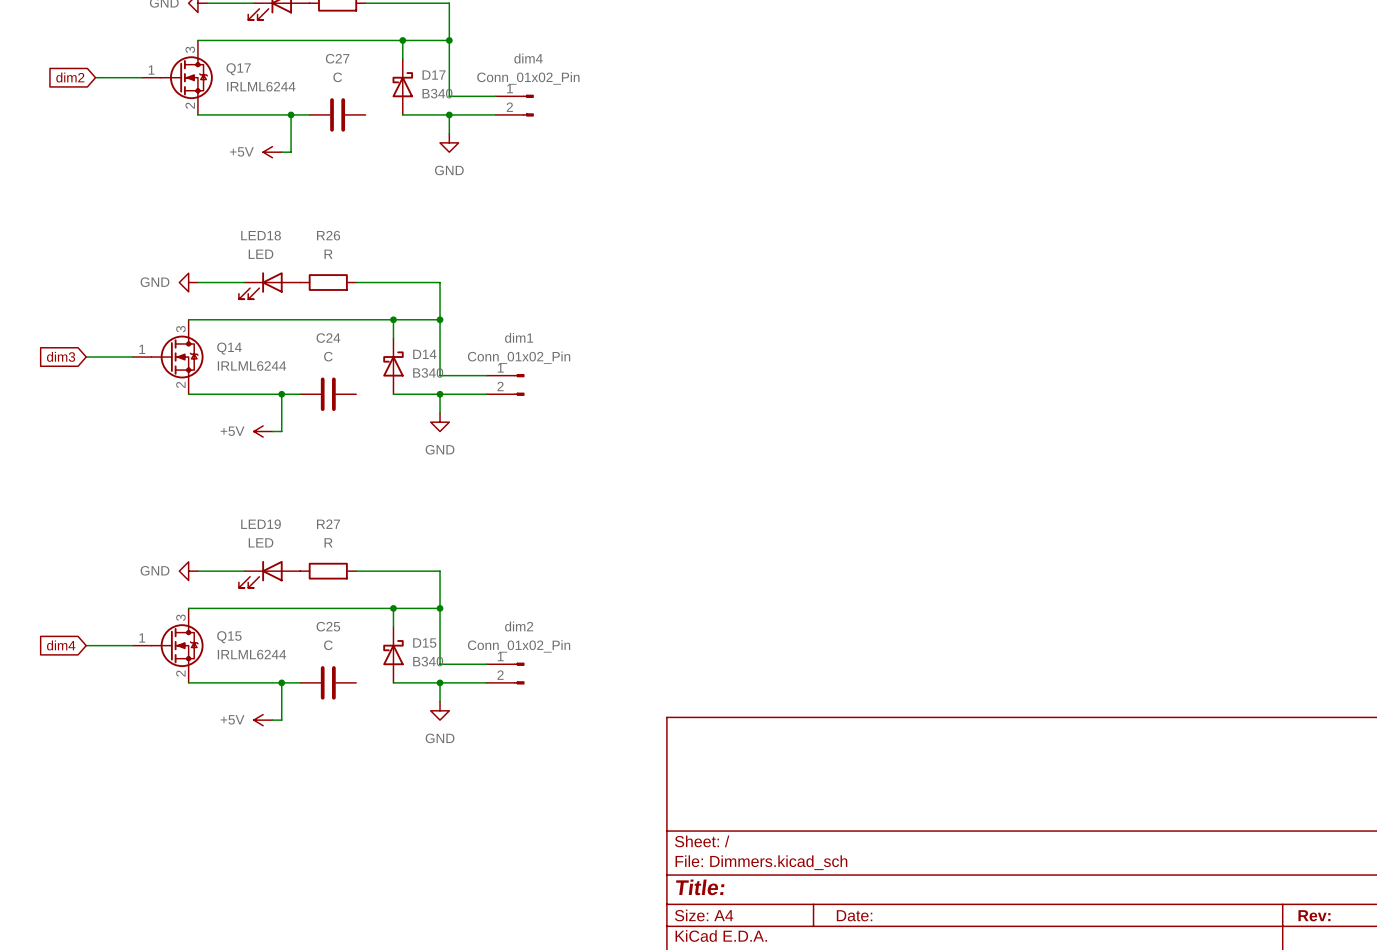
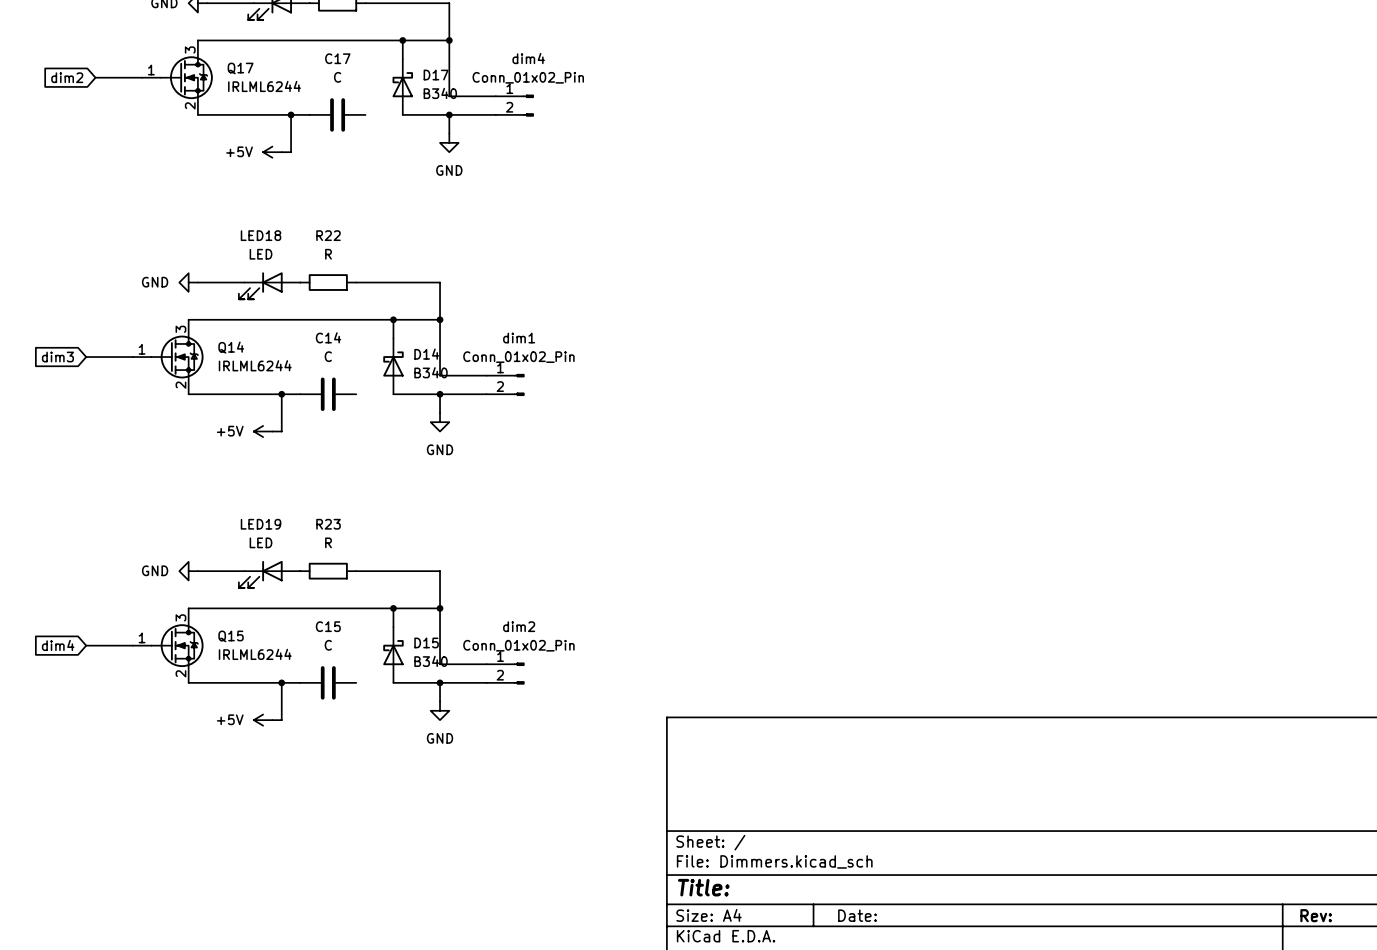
C27 name: C27 (337, 58) -> C17 (337, 58)
R26 name: R26 (328, 235) -> R22 (328, 235)
C24 name: C24 (328, 338) -> C14 (328, 337)
R27 name: R27 (328, 524) -> R23 (328, 524)
C25 name: C25 (328, 626) -> C15 (328, 626)

